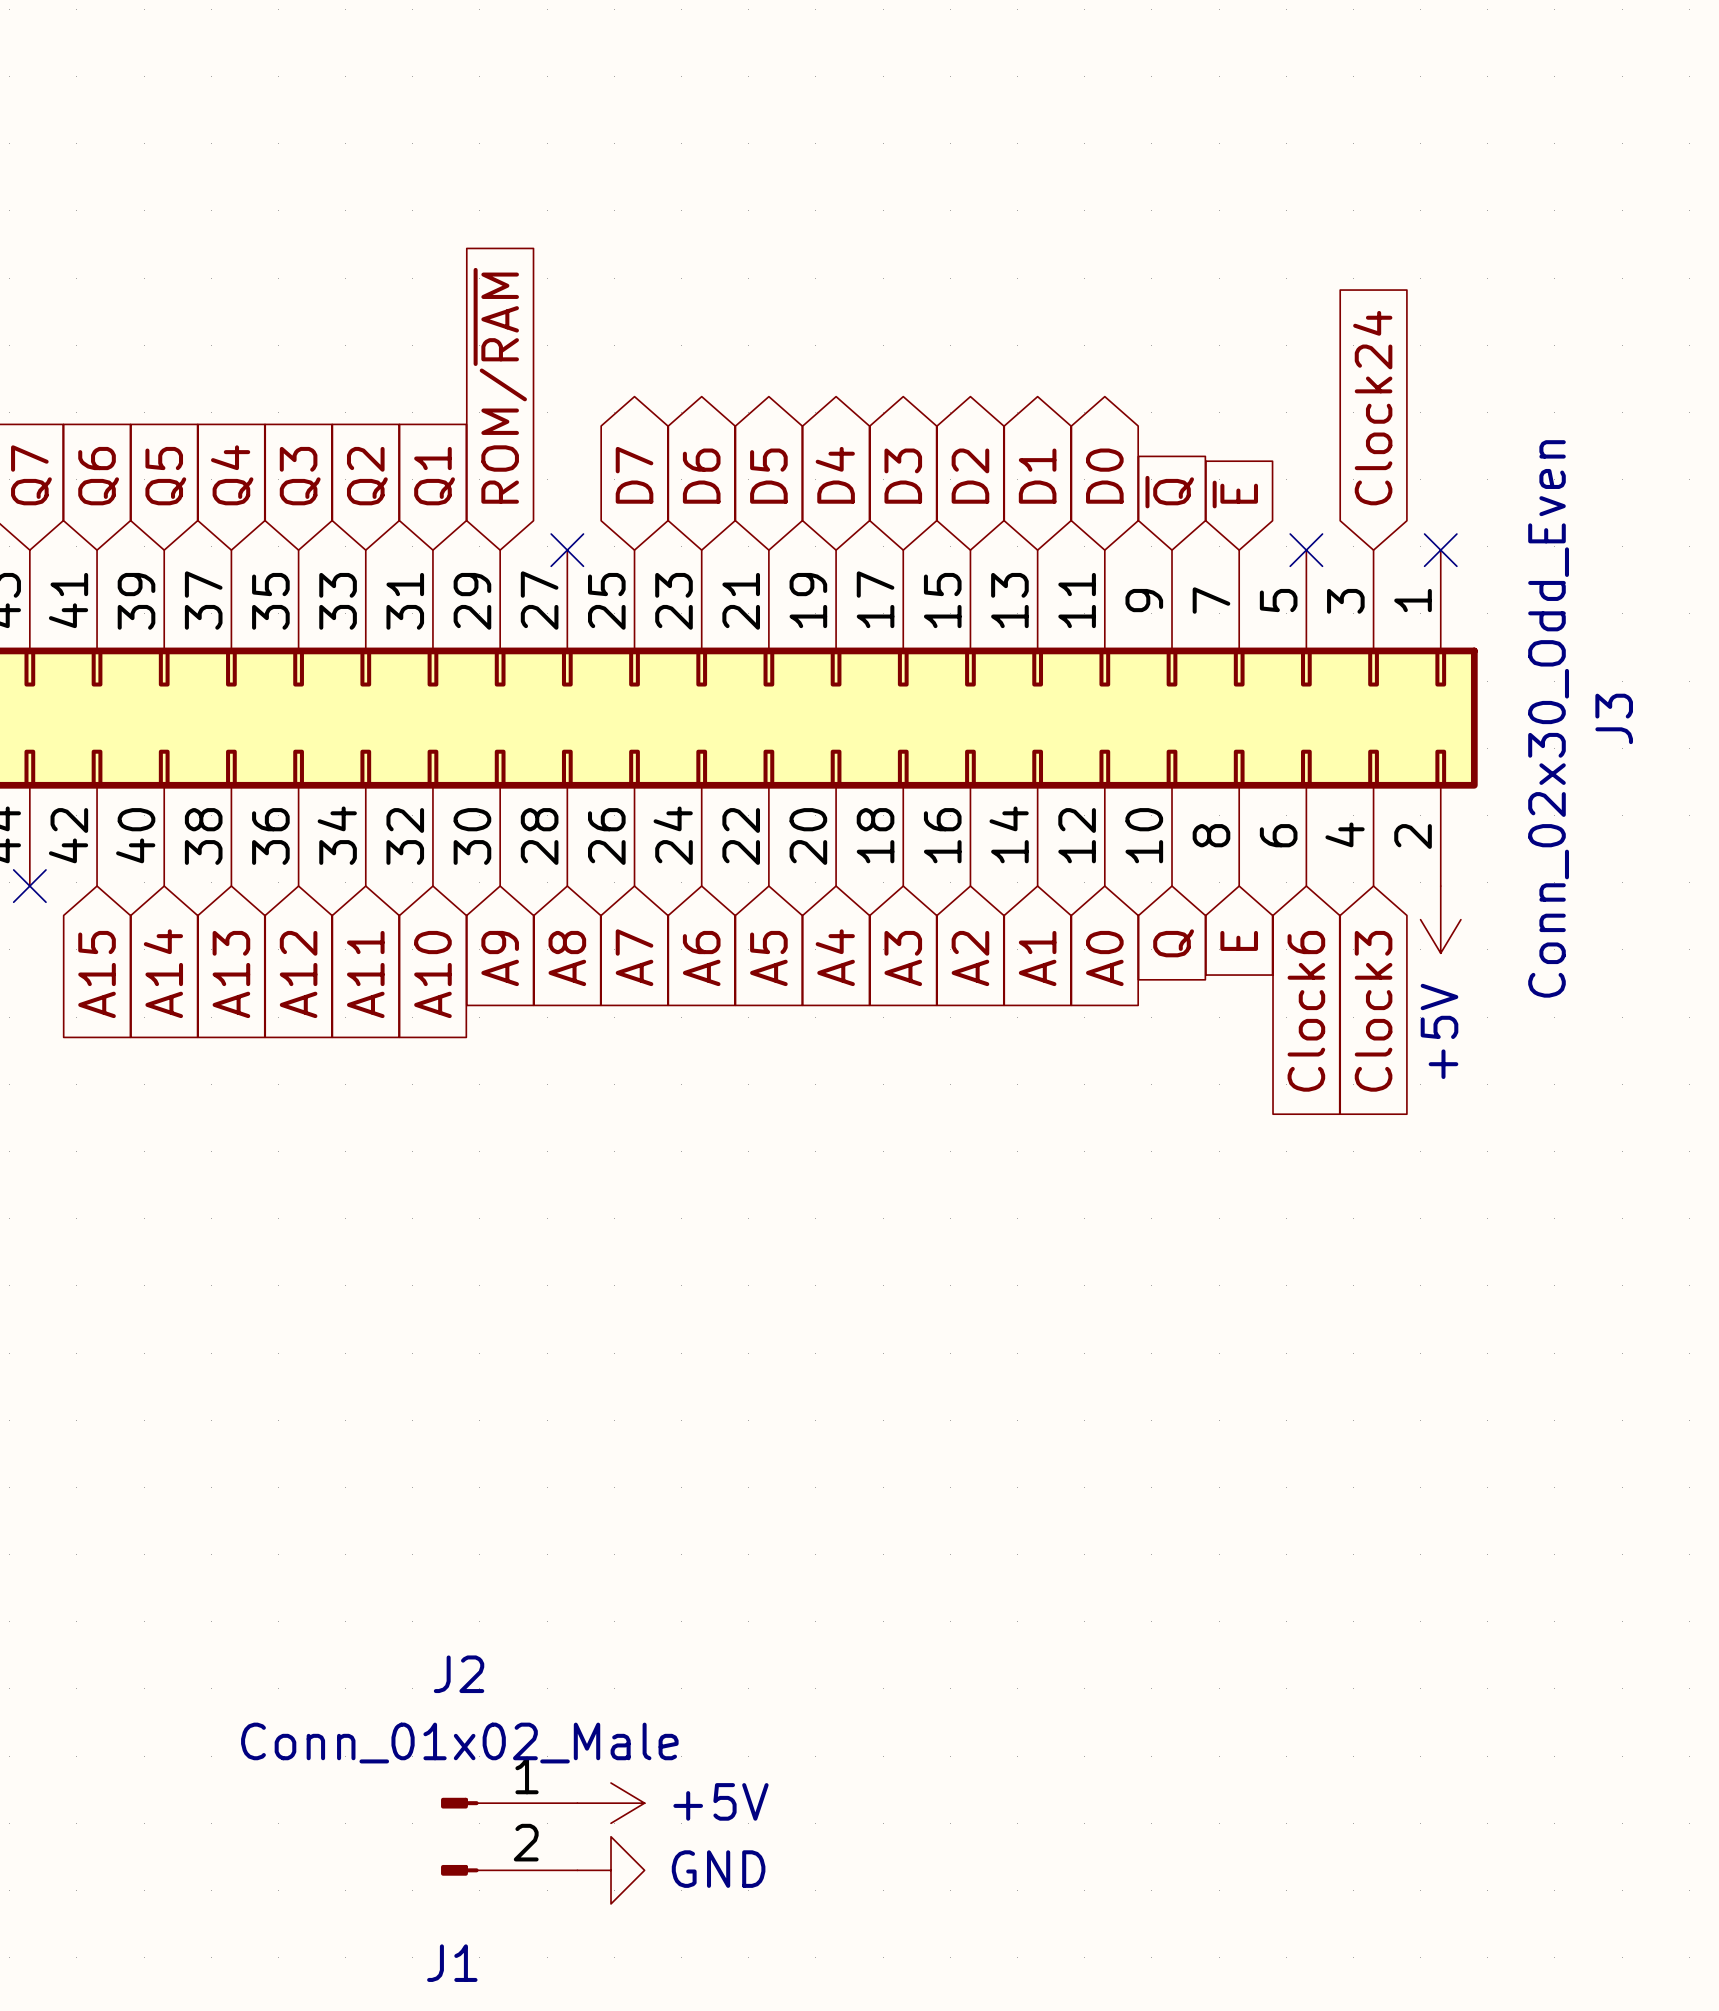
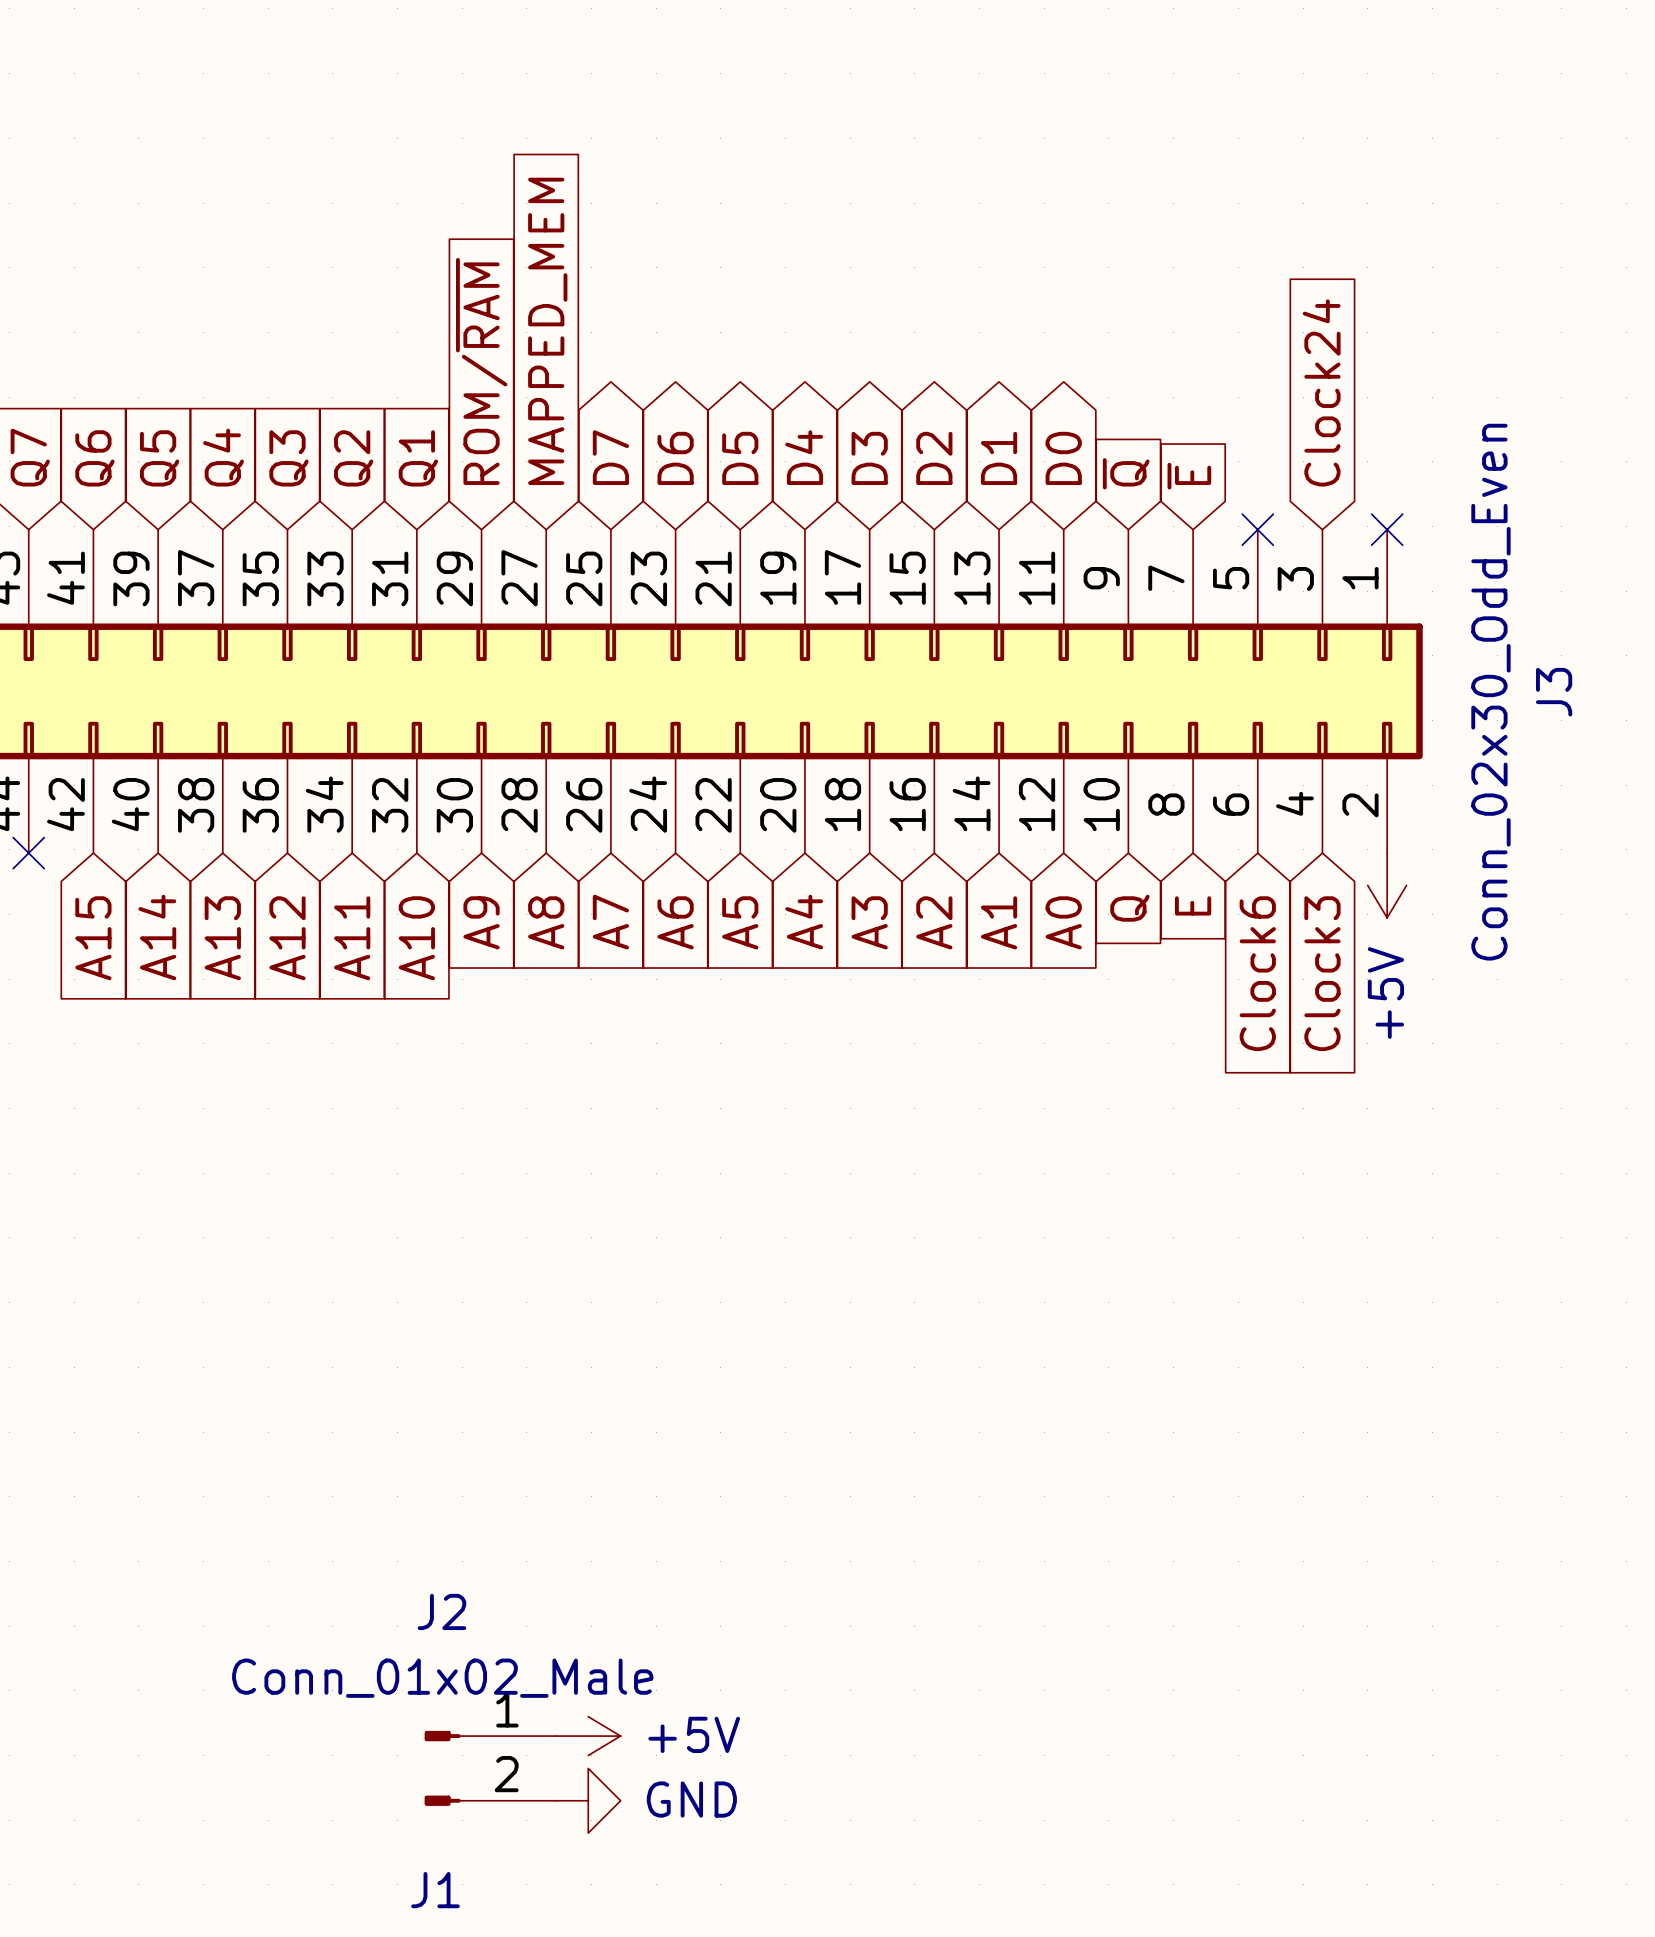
global label: none -> MAPPED_MEM (547, 331)
no-connect mark: (567, 550) -> none

